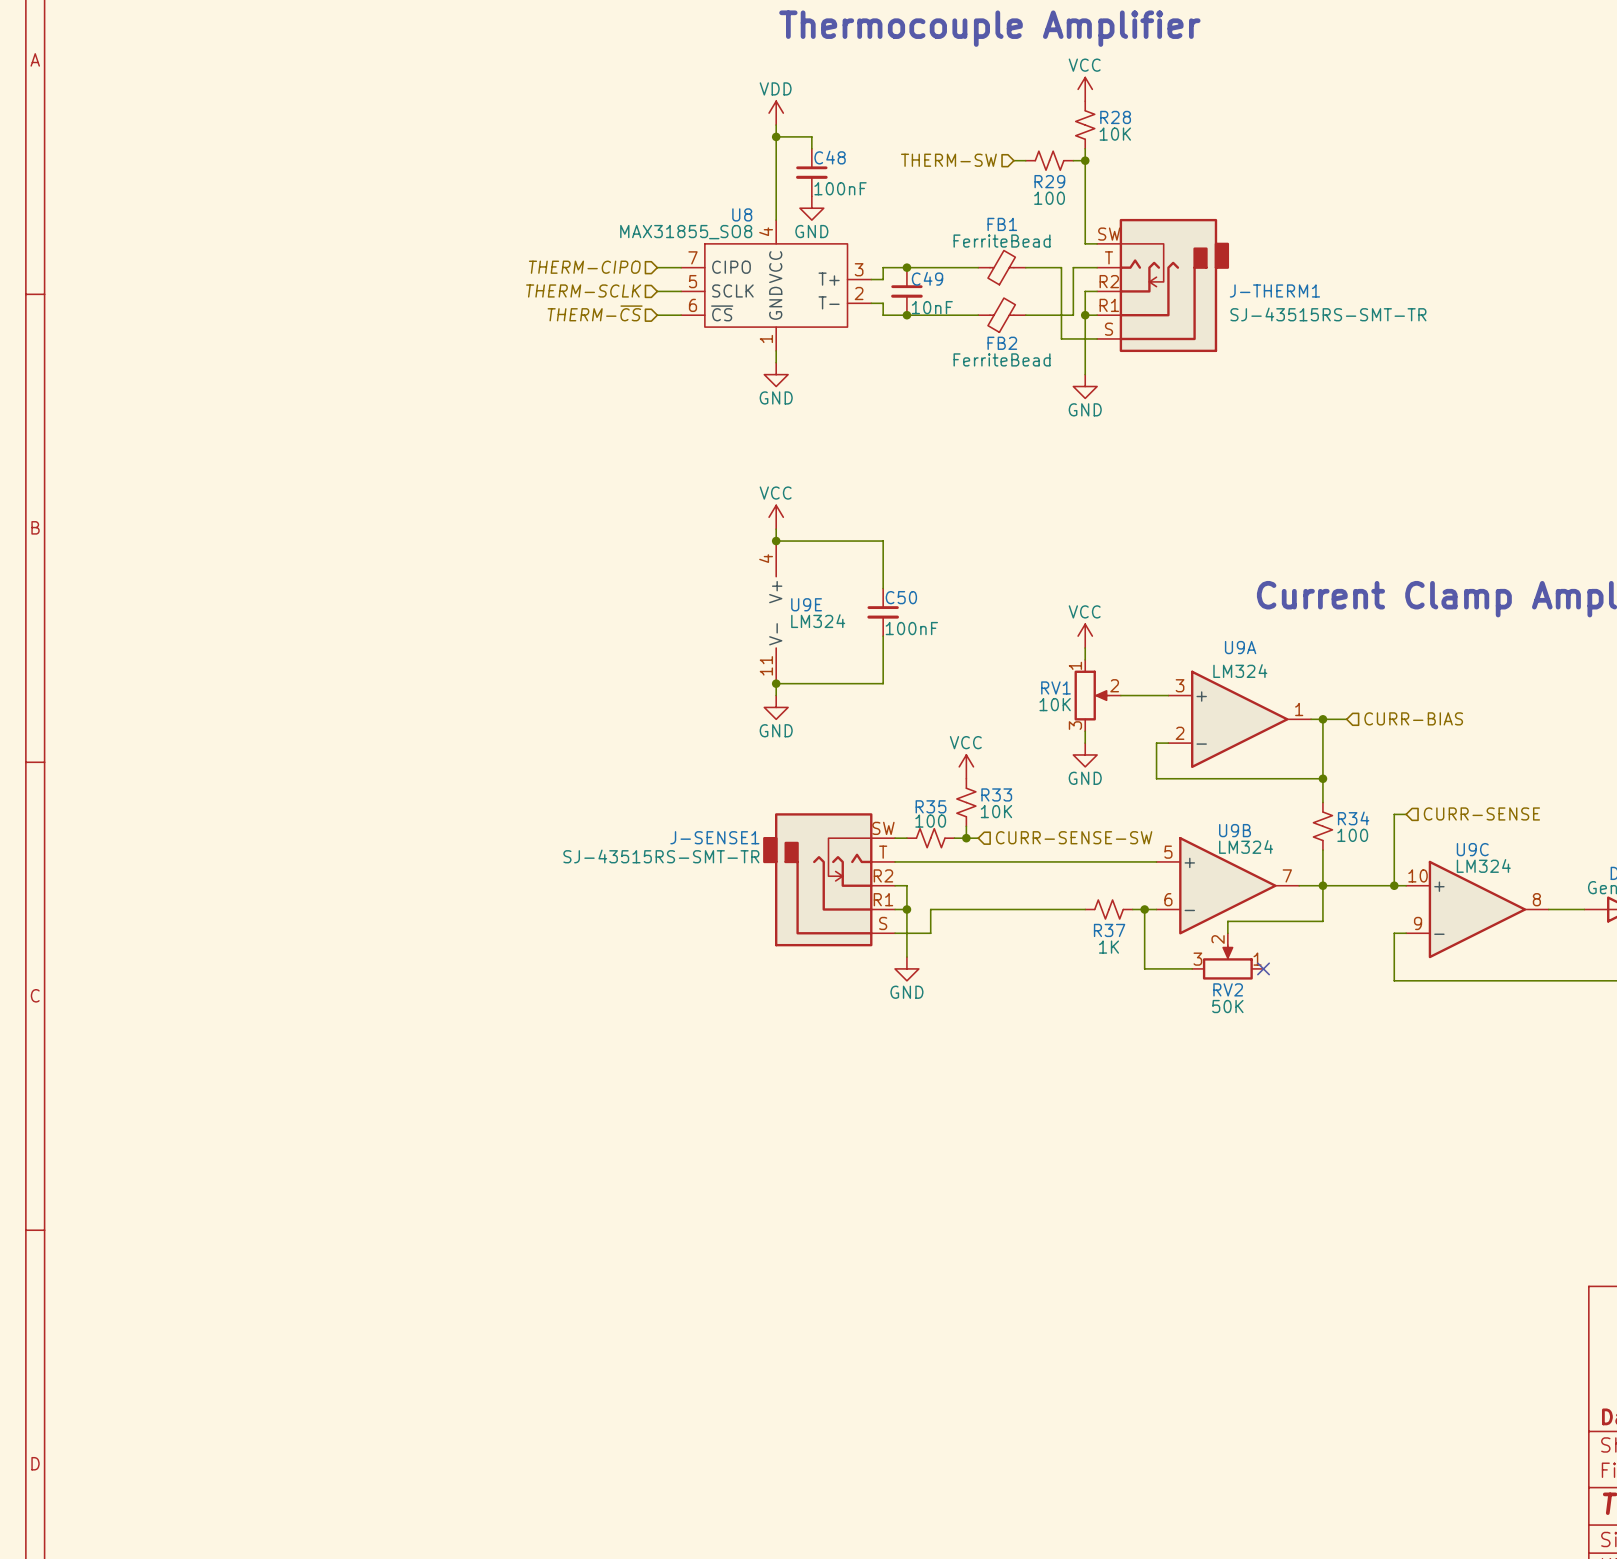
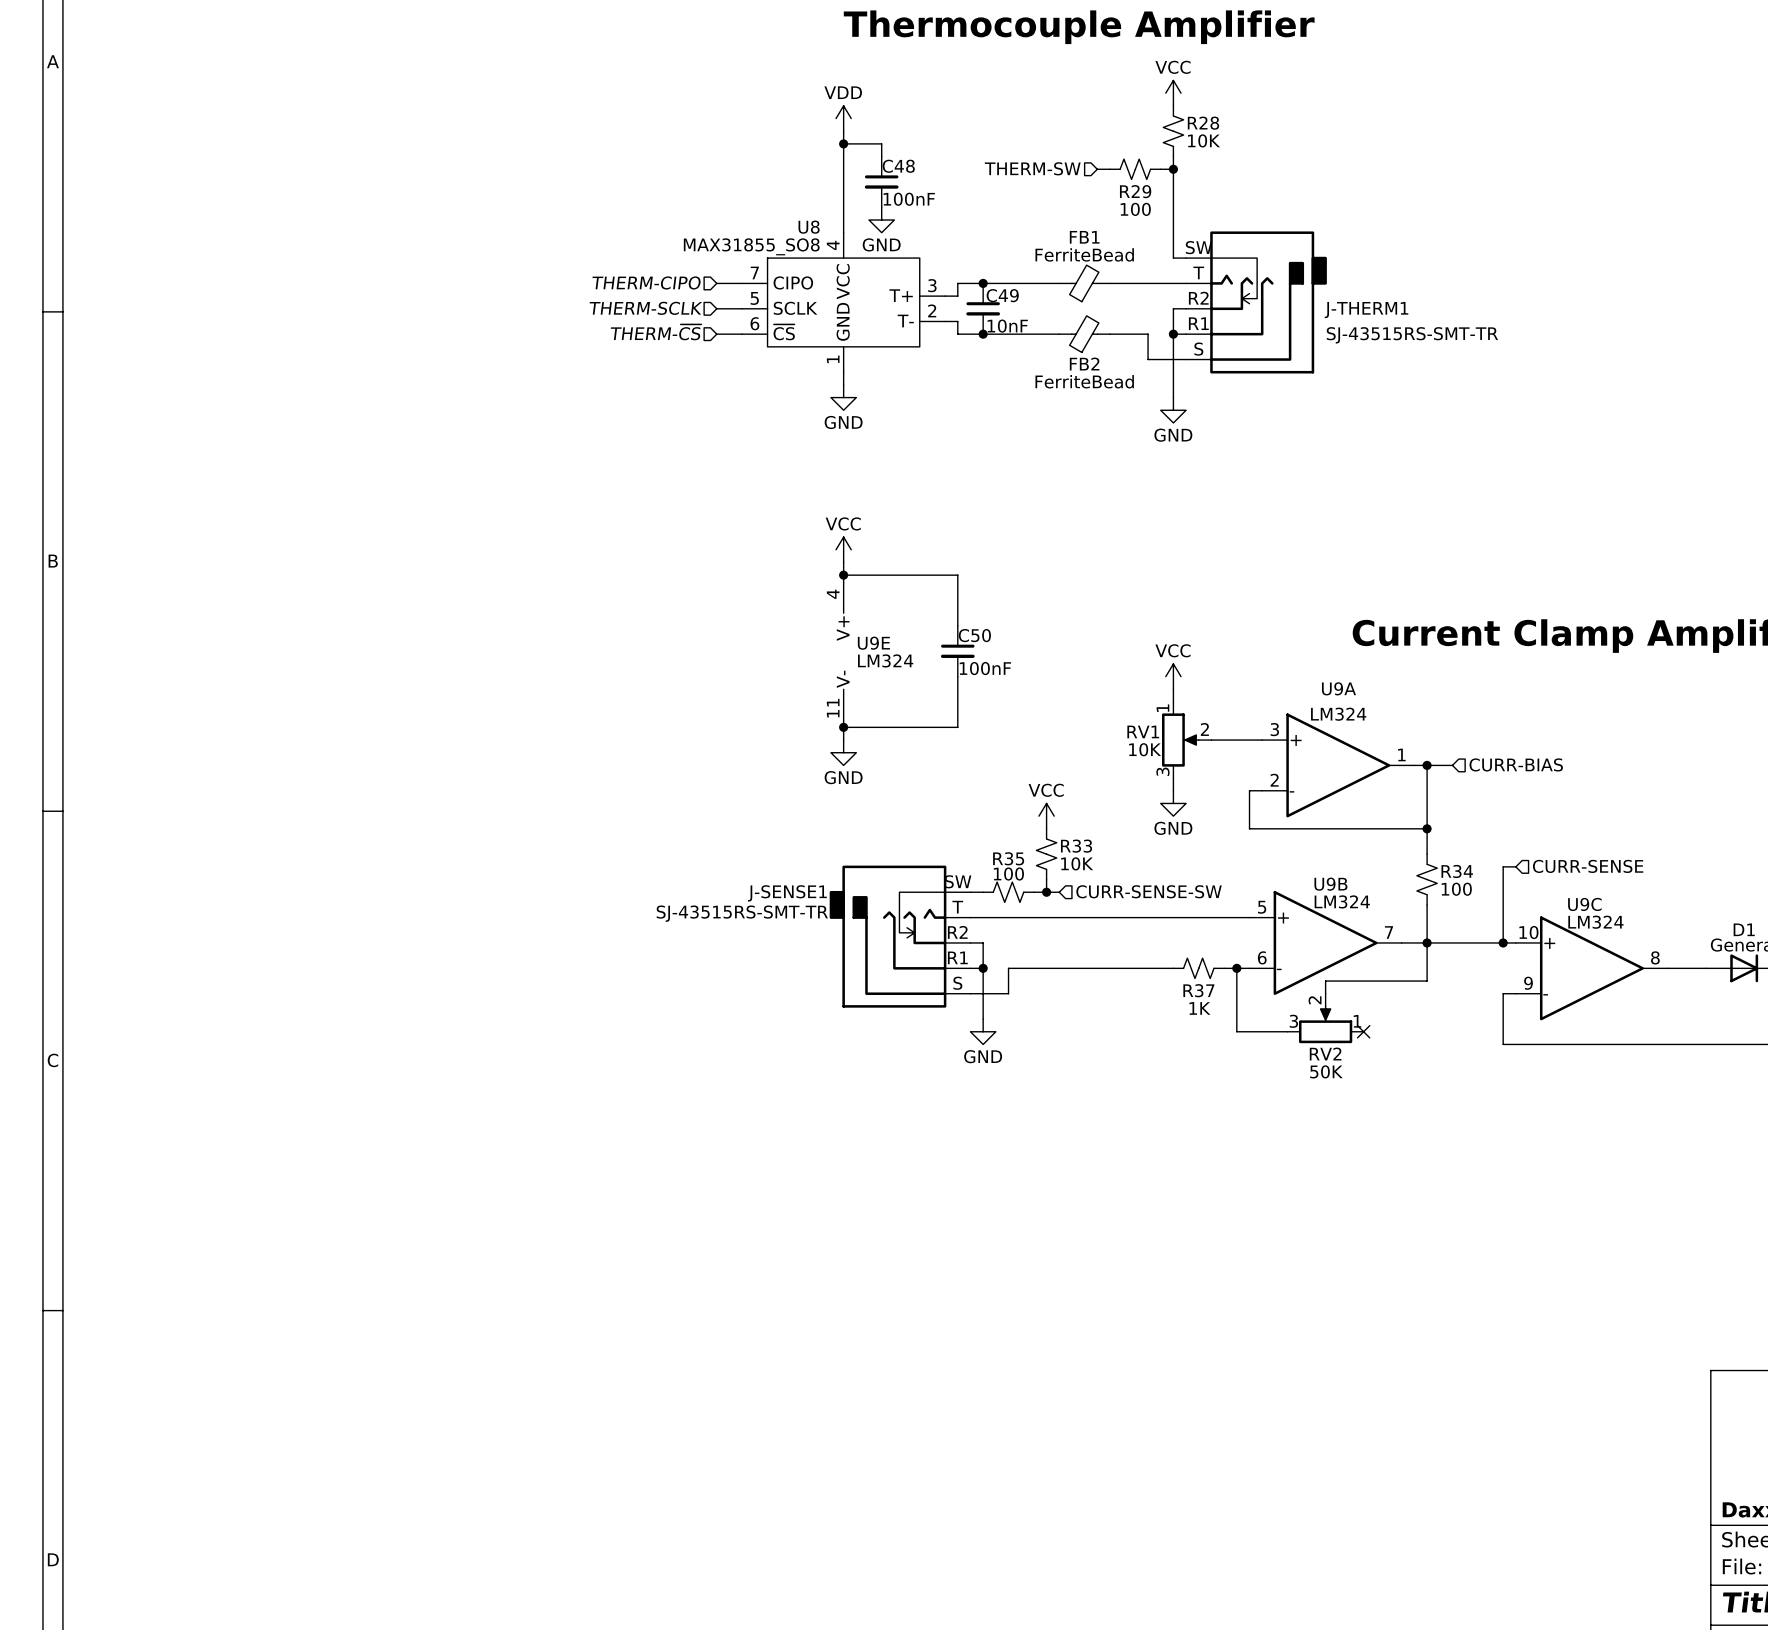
wire: (1061, 267) (1061, 315) (1073, 315) (1073, 267) -> (1148, 283) (1160, 283)

